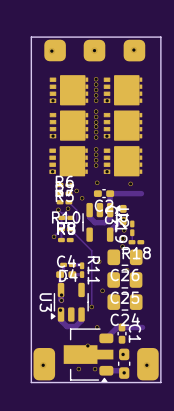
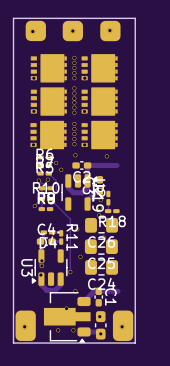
via: none -> (74, 144)

